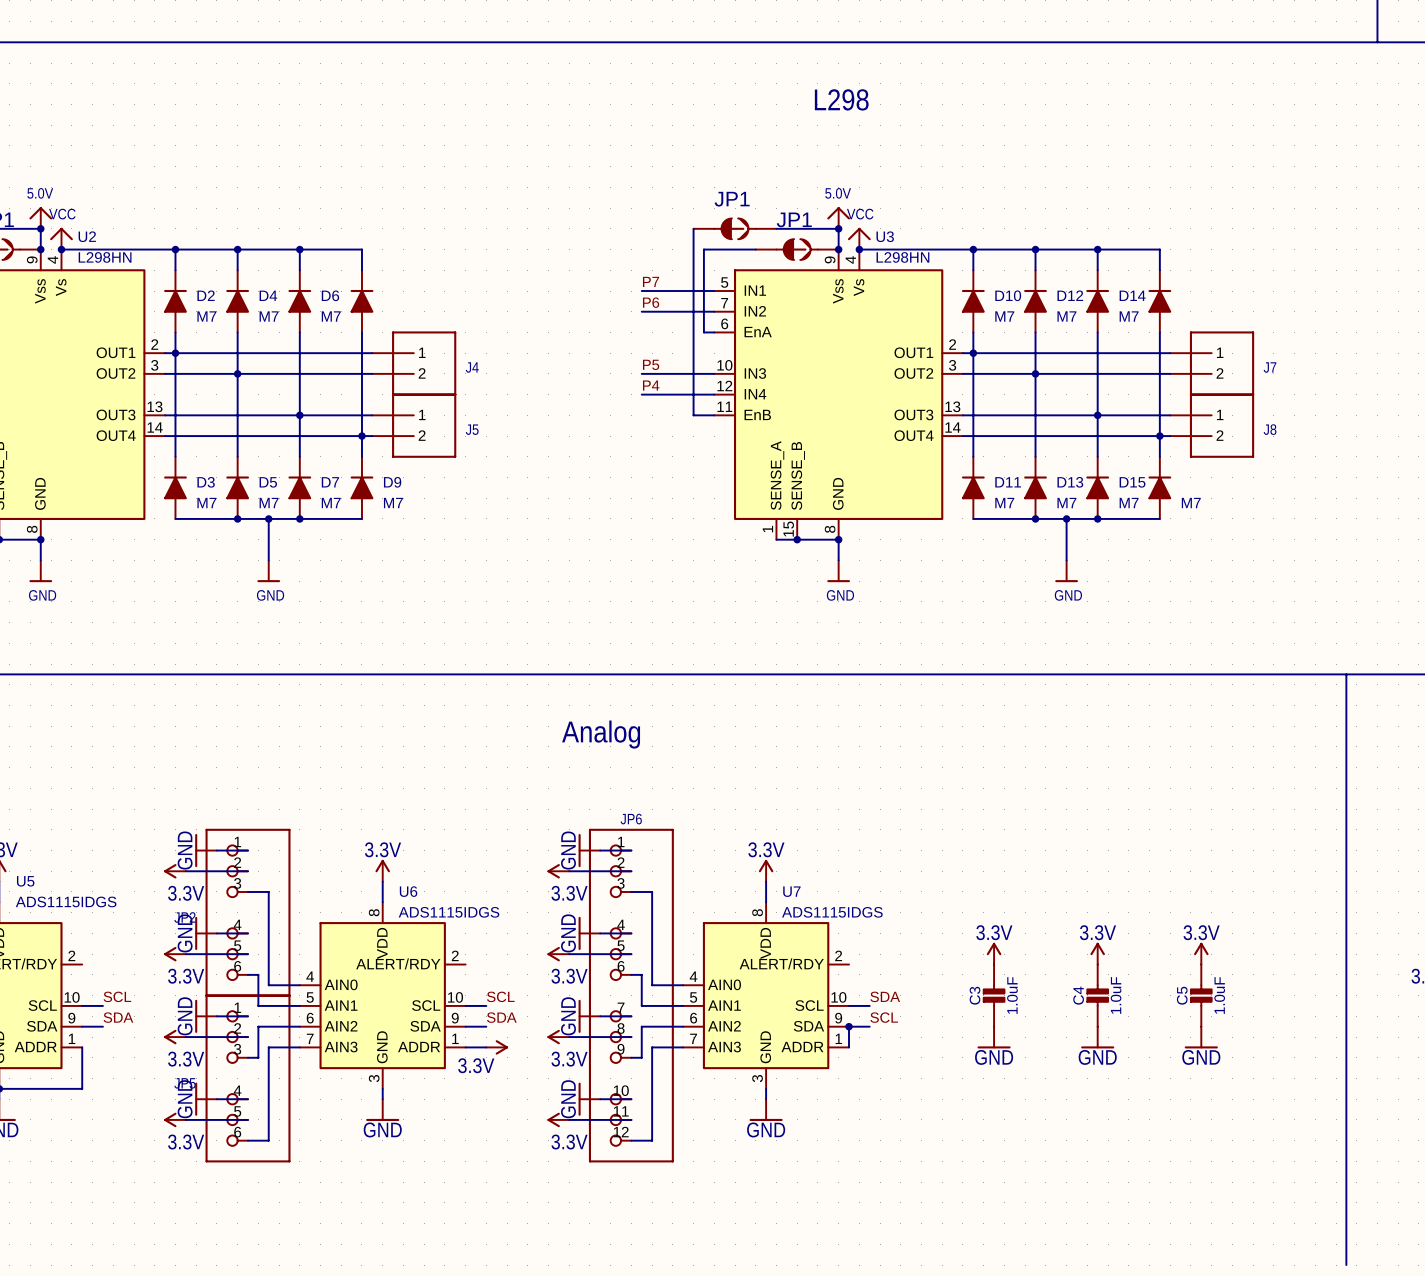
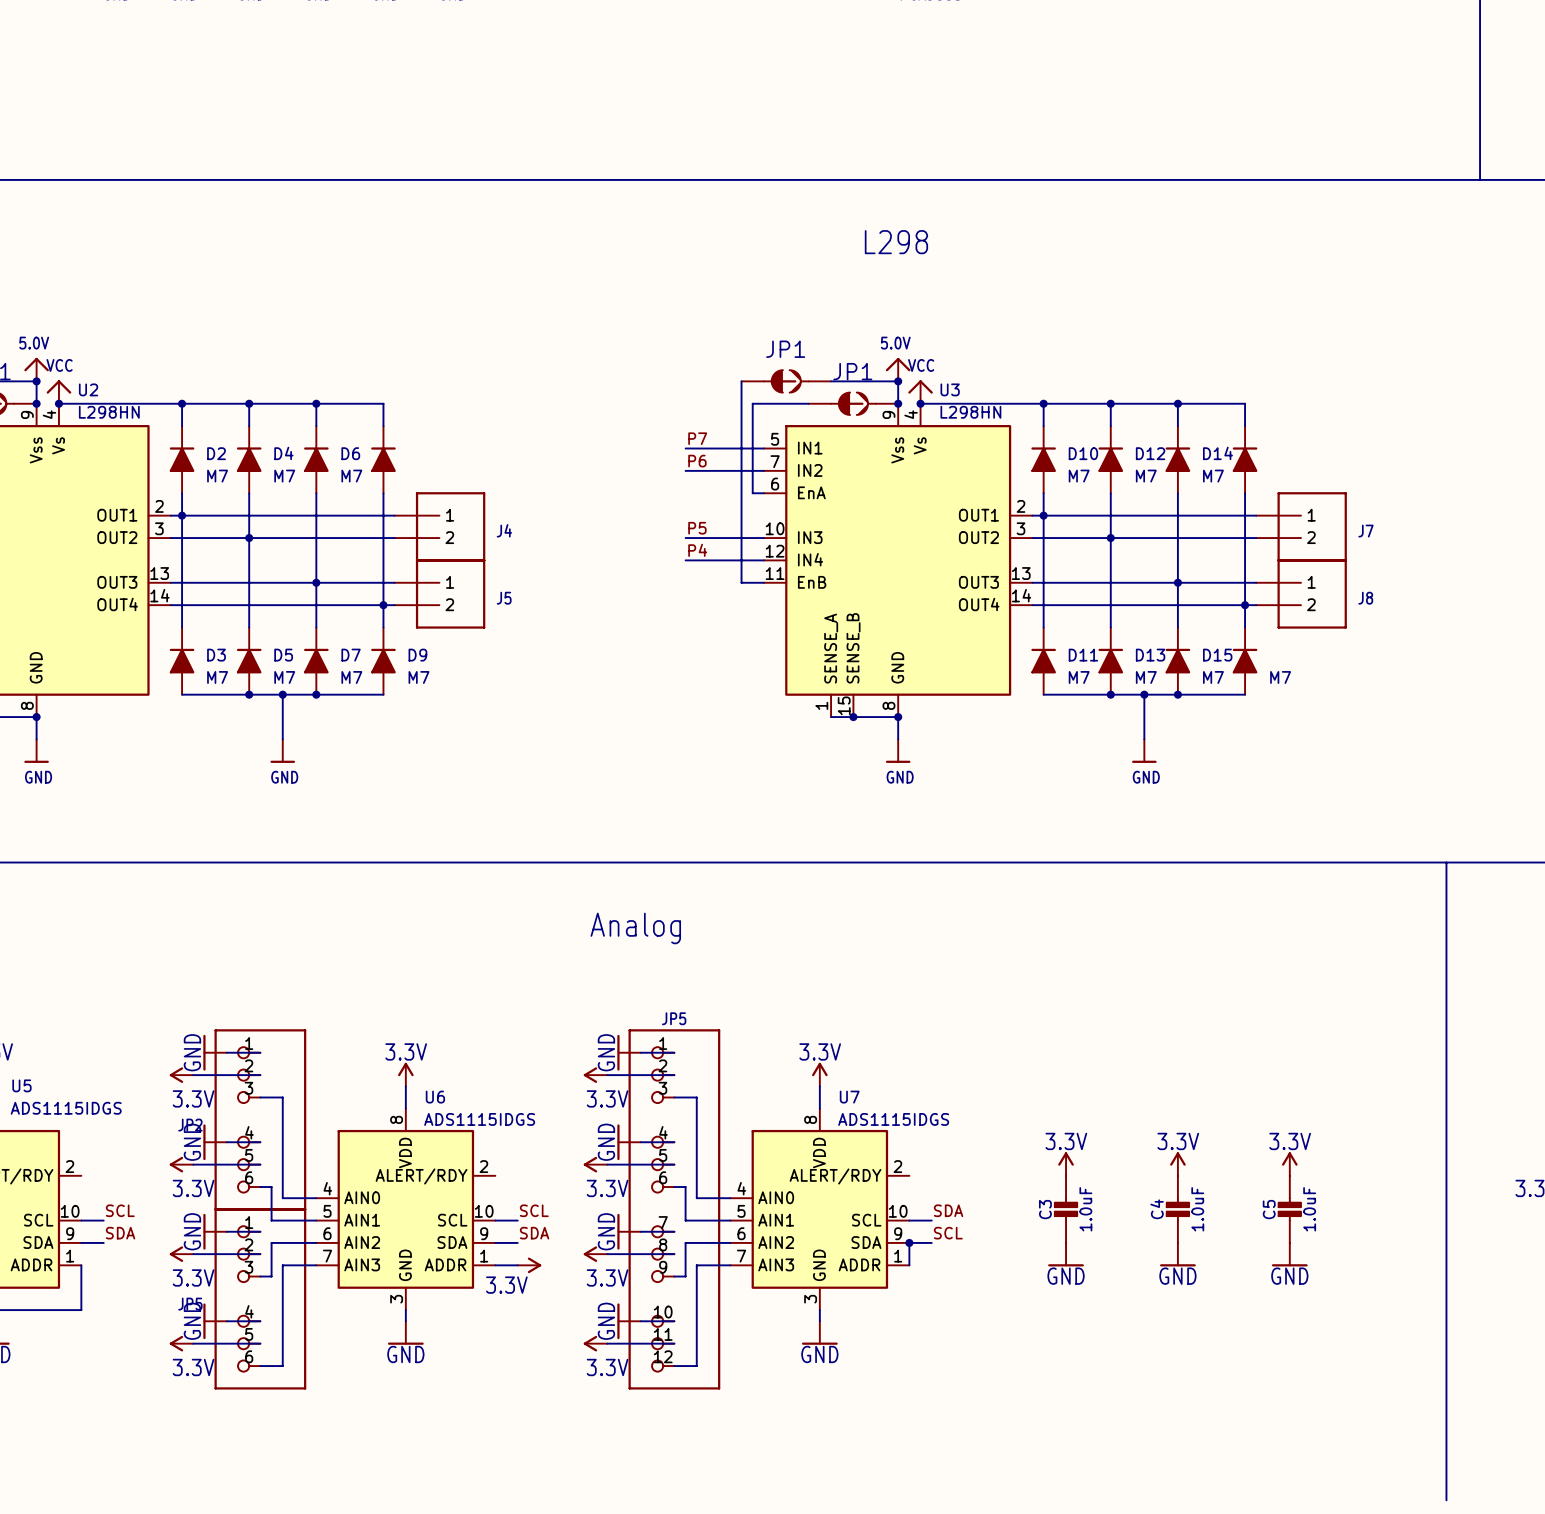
JP6 name: JP6 (631, 819) -> JP5 (674, 1018)

